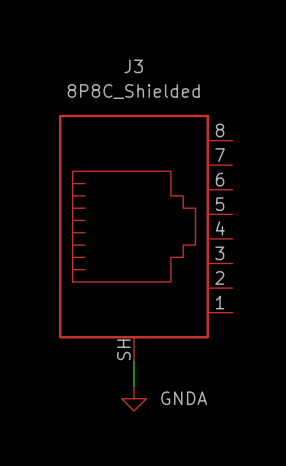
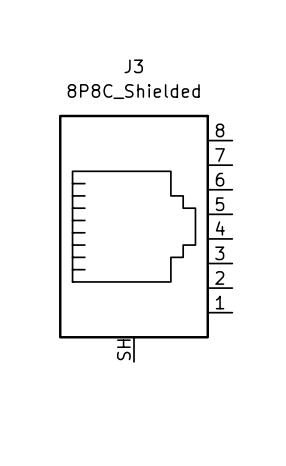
wire: (134, 361) (134, 386) -> none
power symbol: GNDA (134, 398) -> none

